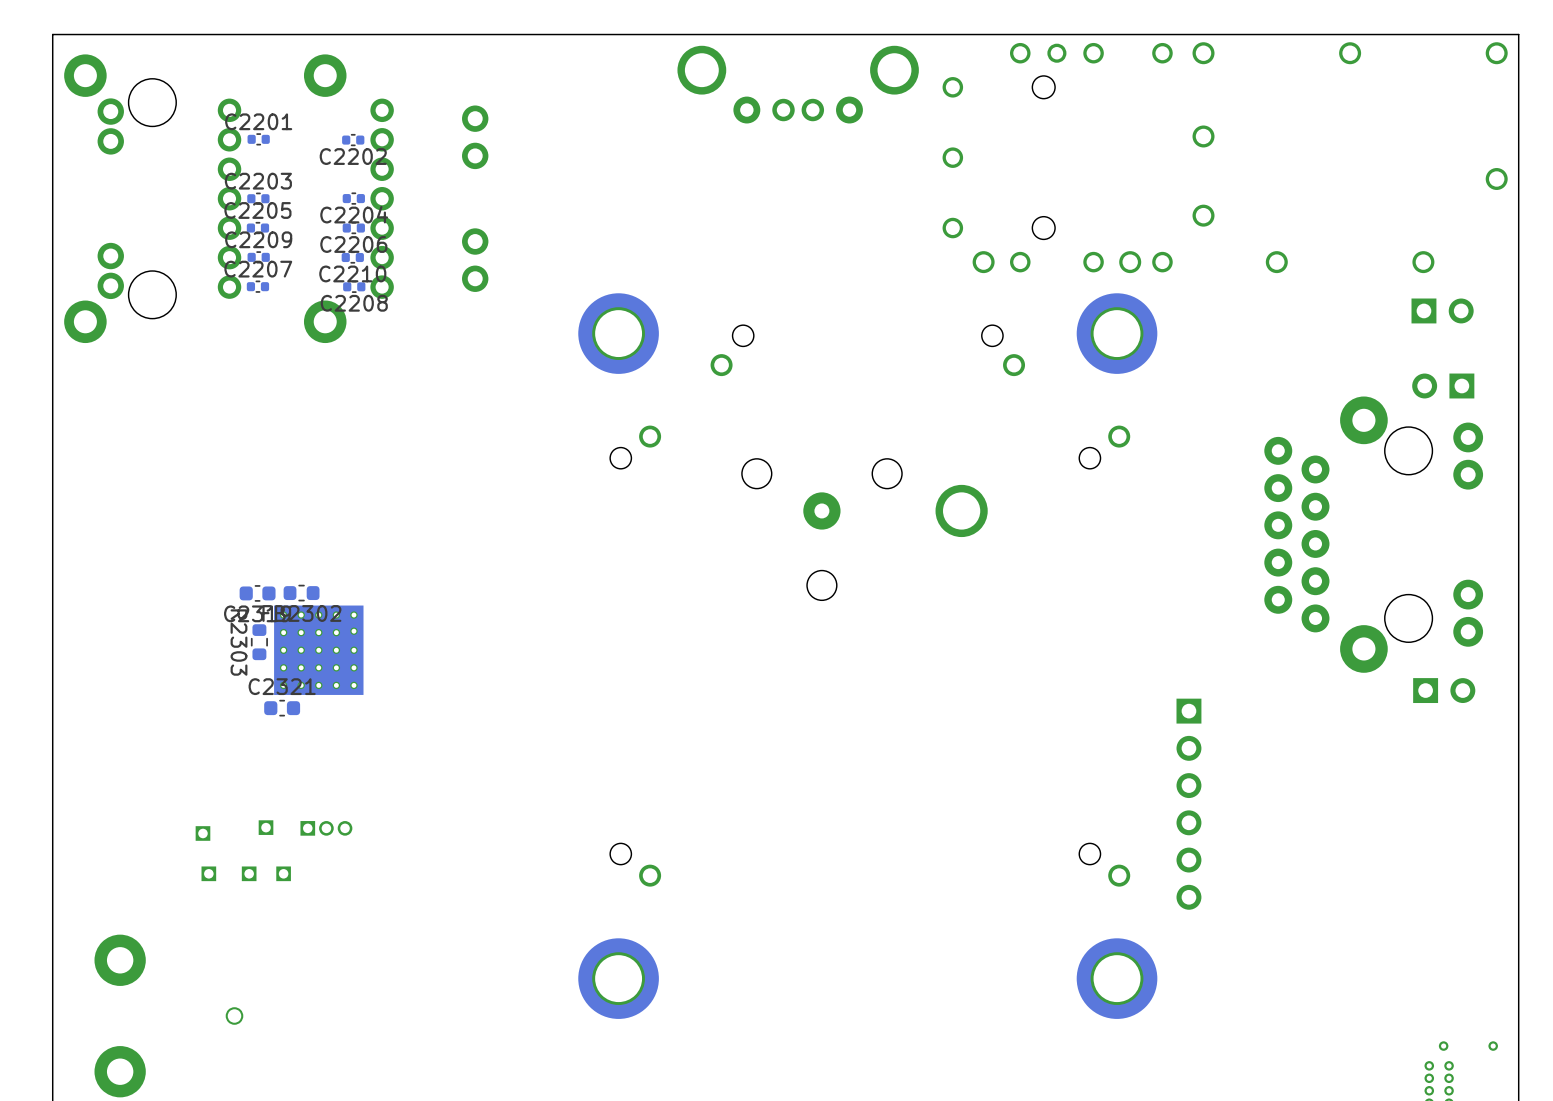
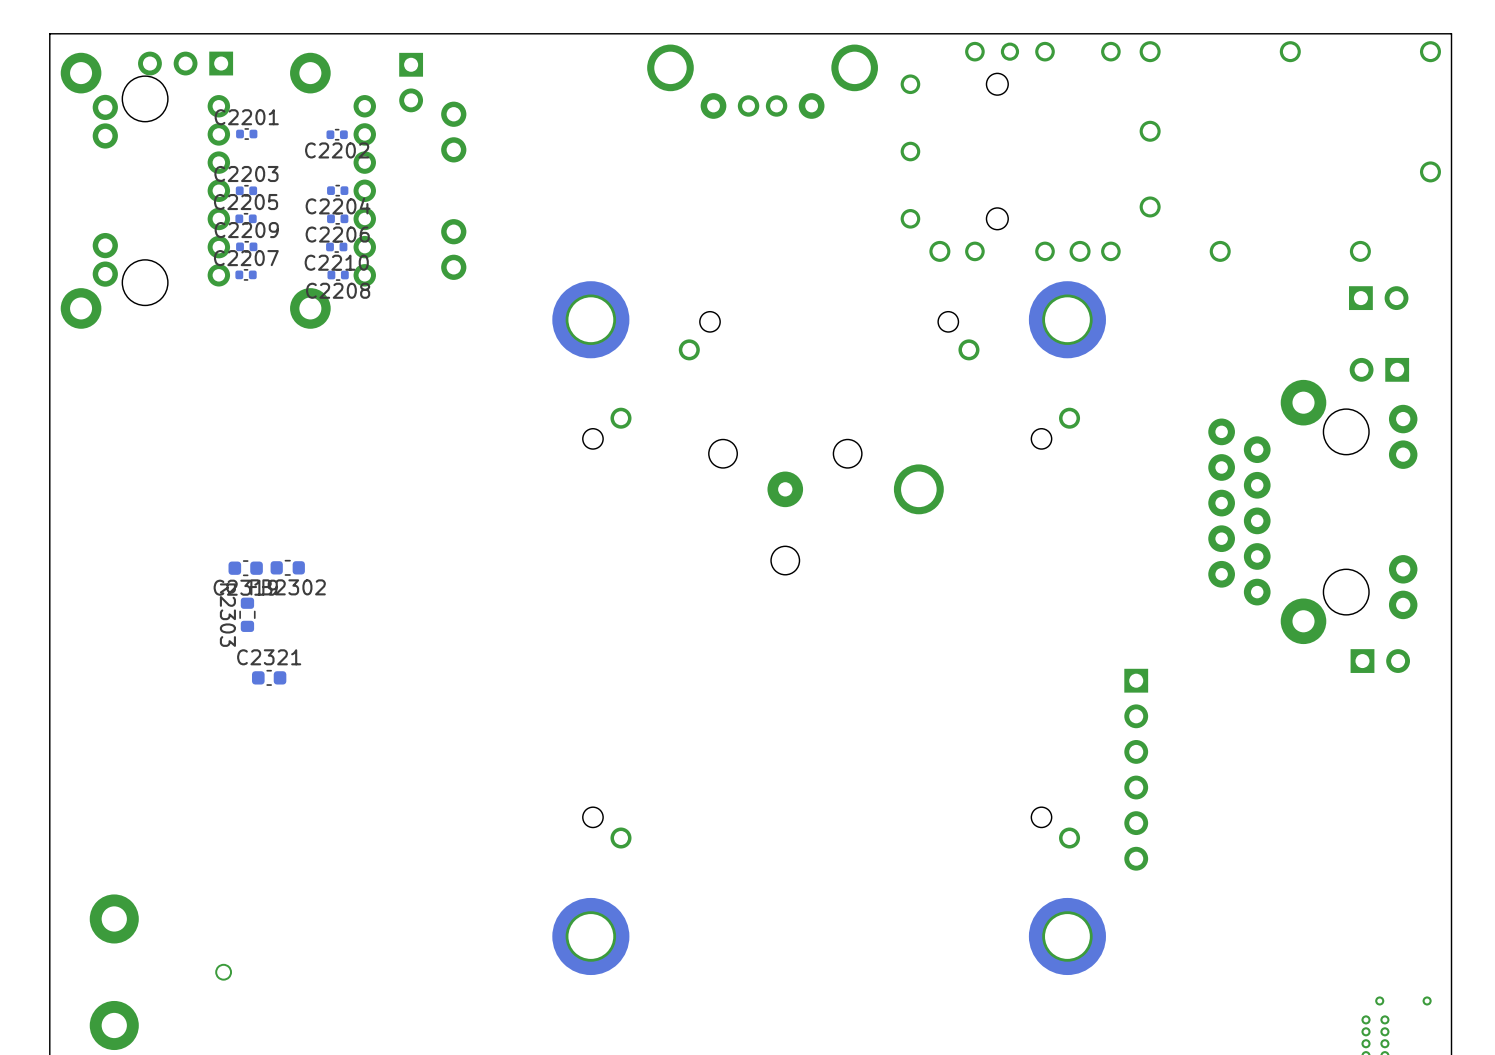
part: none -> (185, 63)
part: none -> (411, 82)
part: (318, 650) -> none
part: (266, 827) -> none
part: (326, 828) -> none
part: (202, 833) -> none
part: (208, 873) -> none
part: (249, 873) -> none
part: (283, 873) -> none

